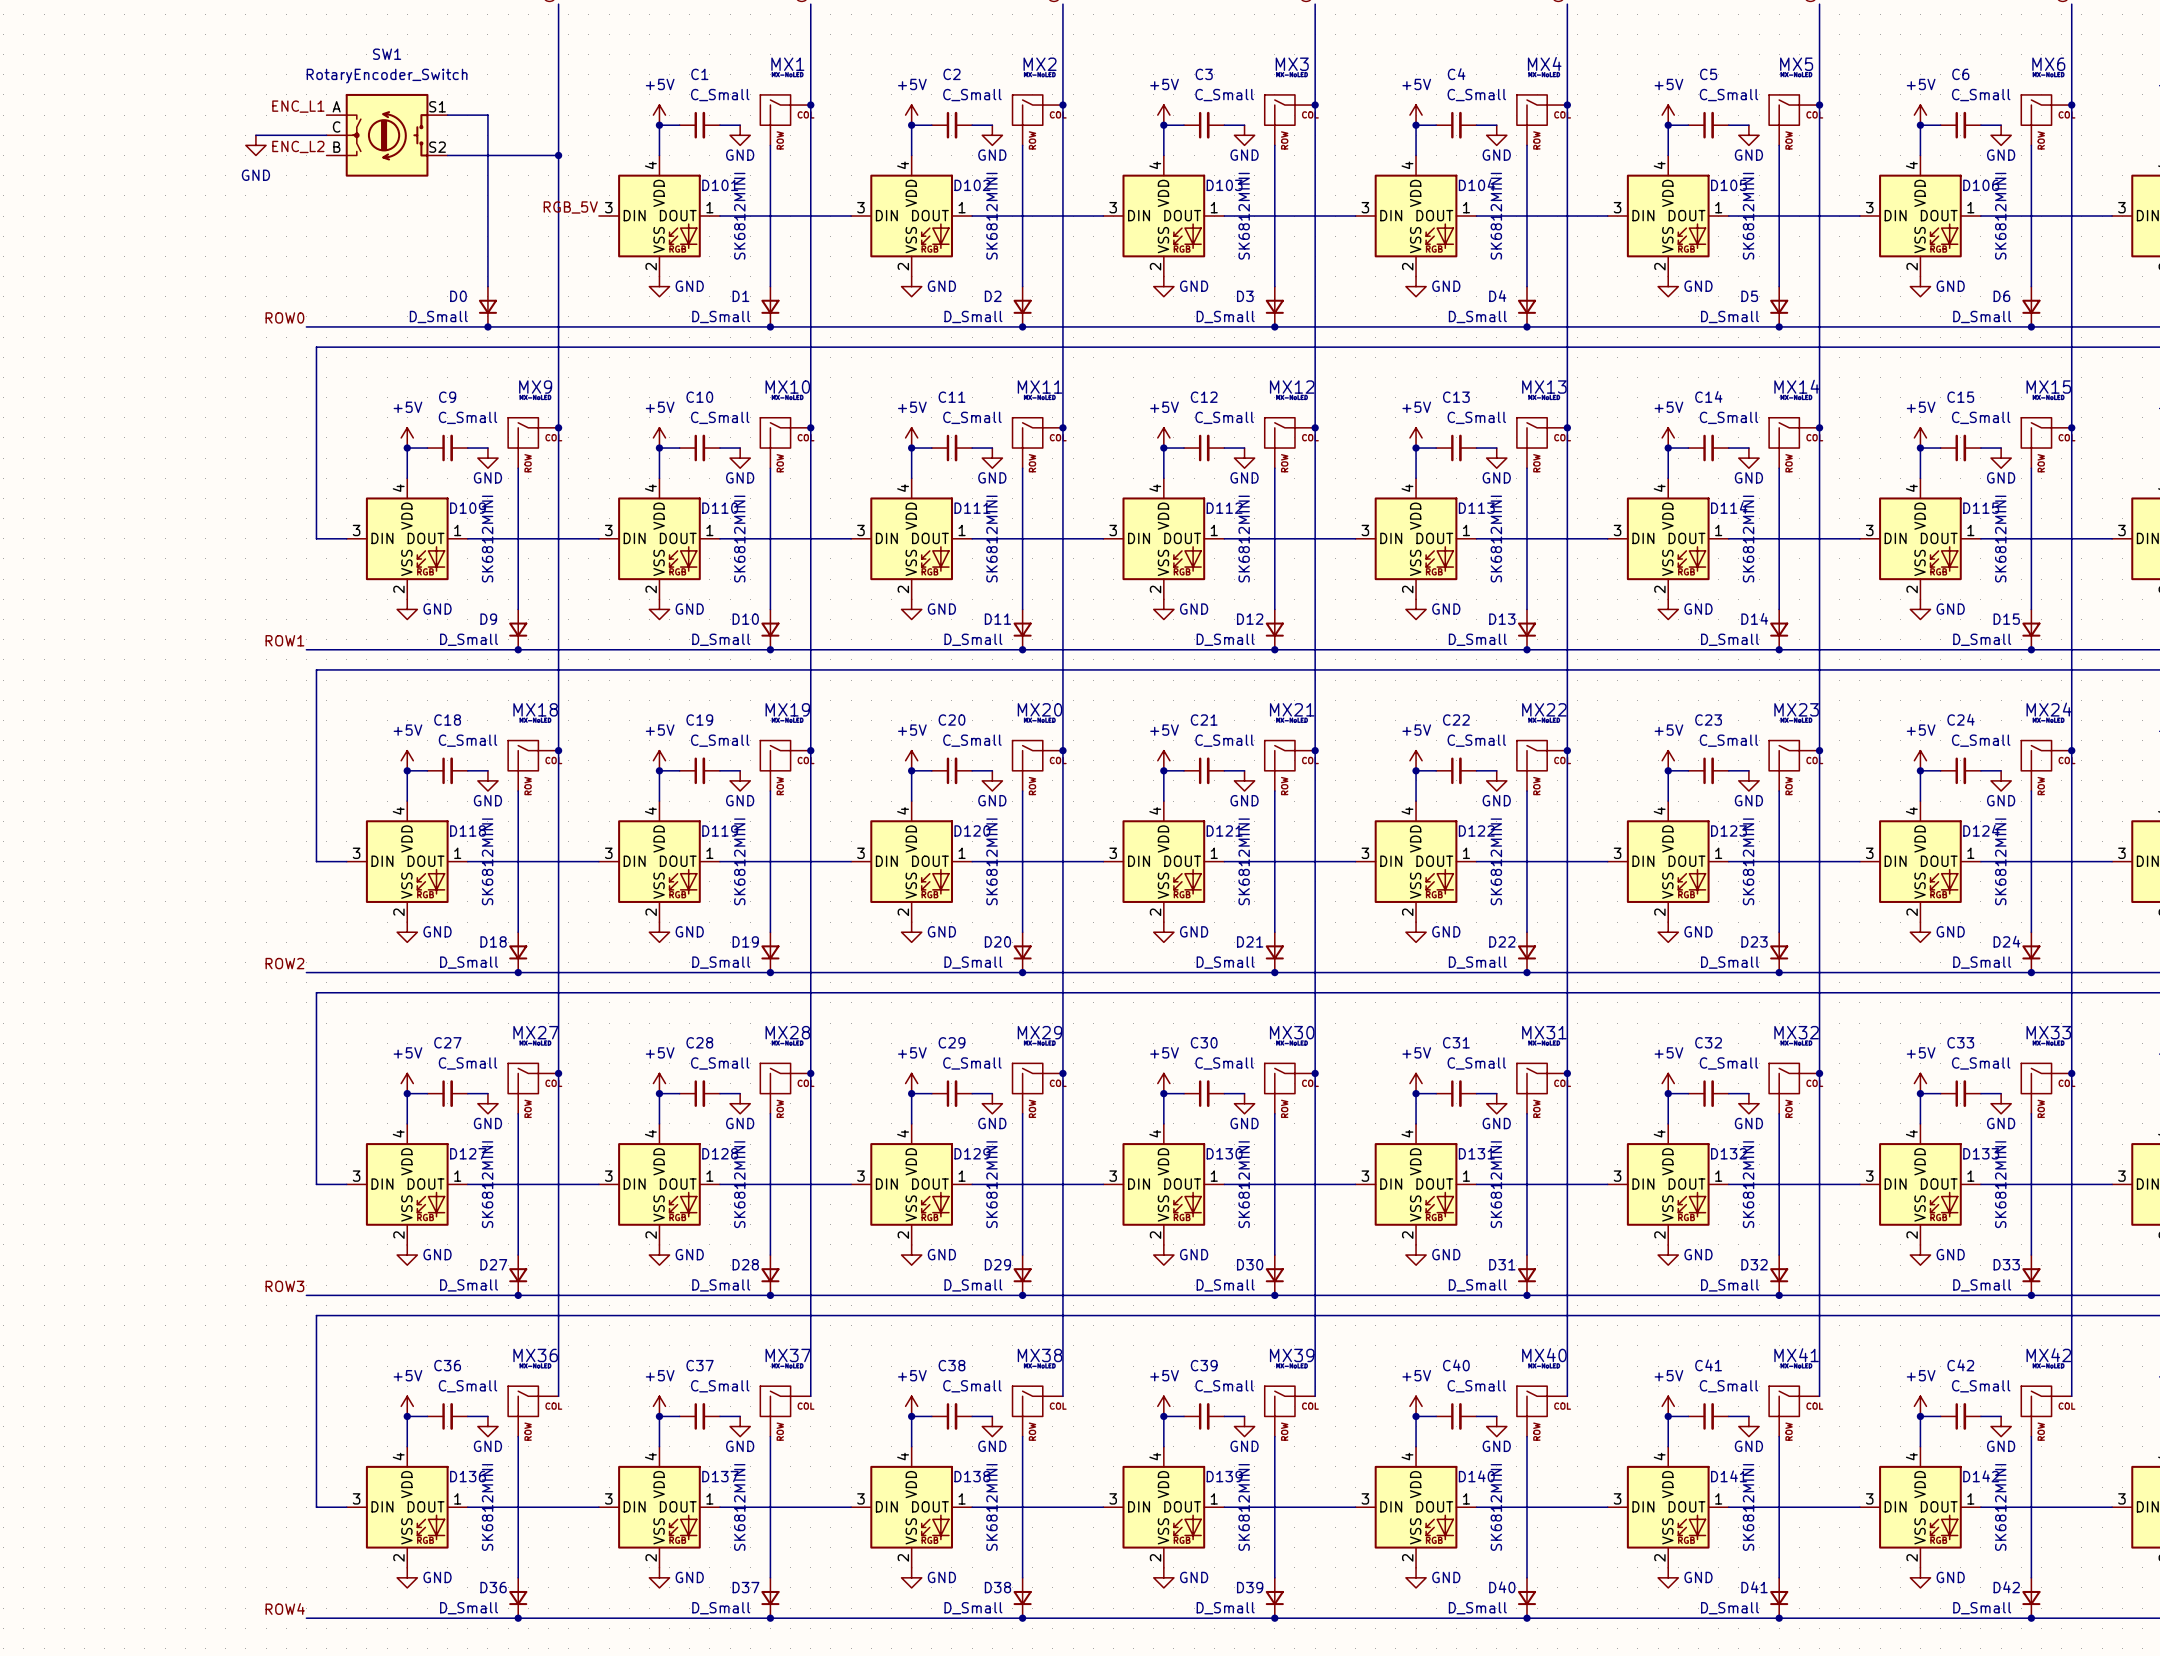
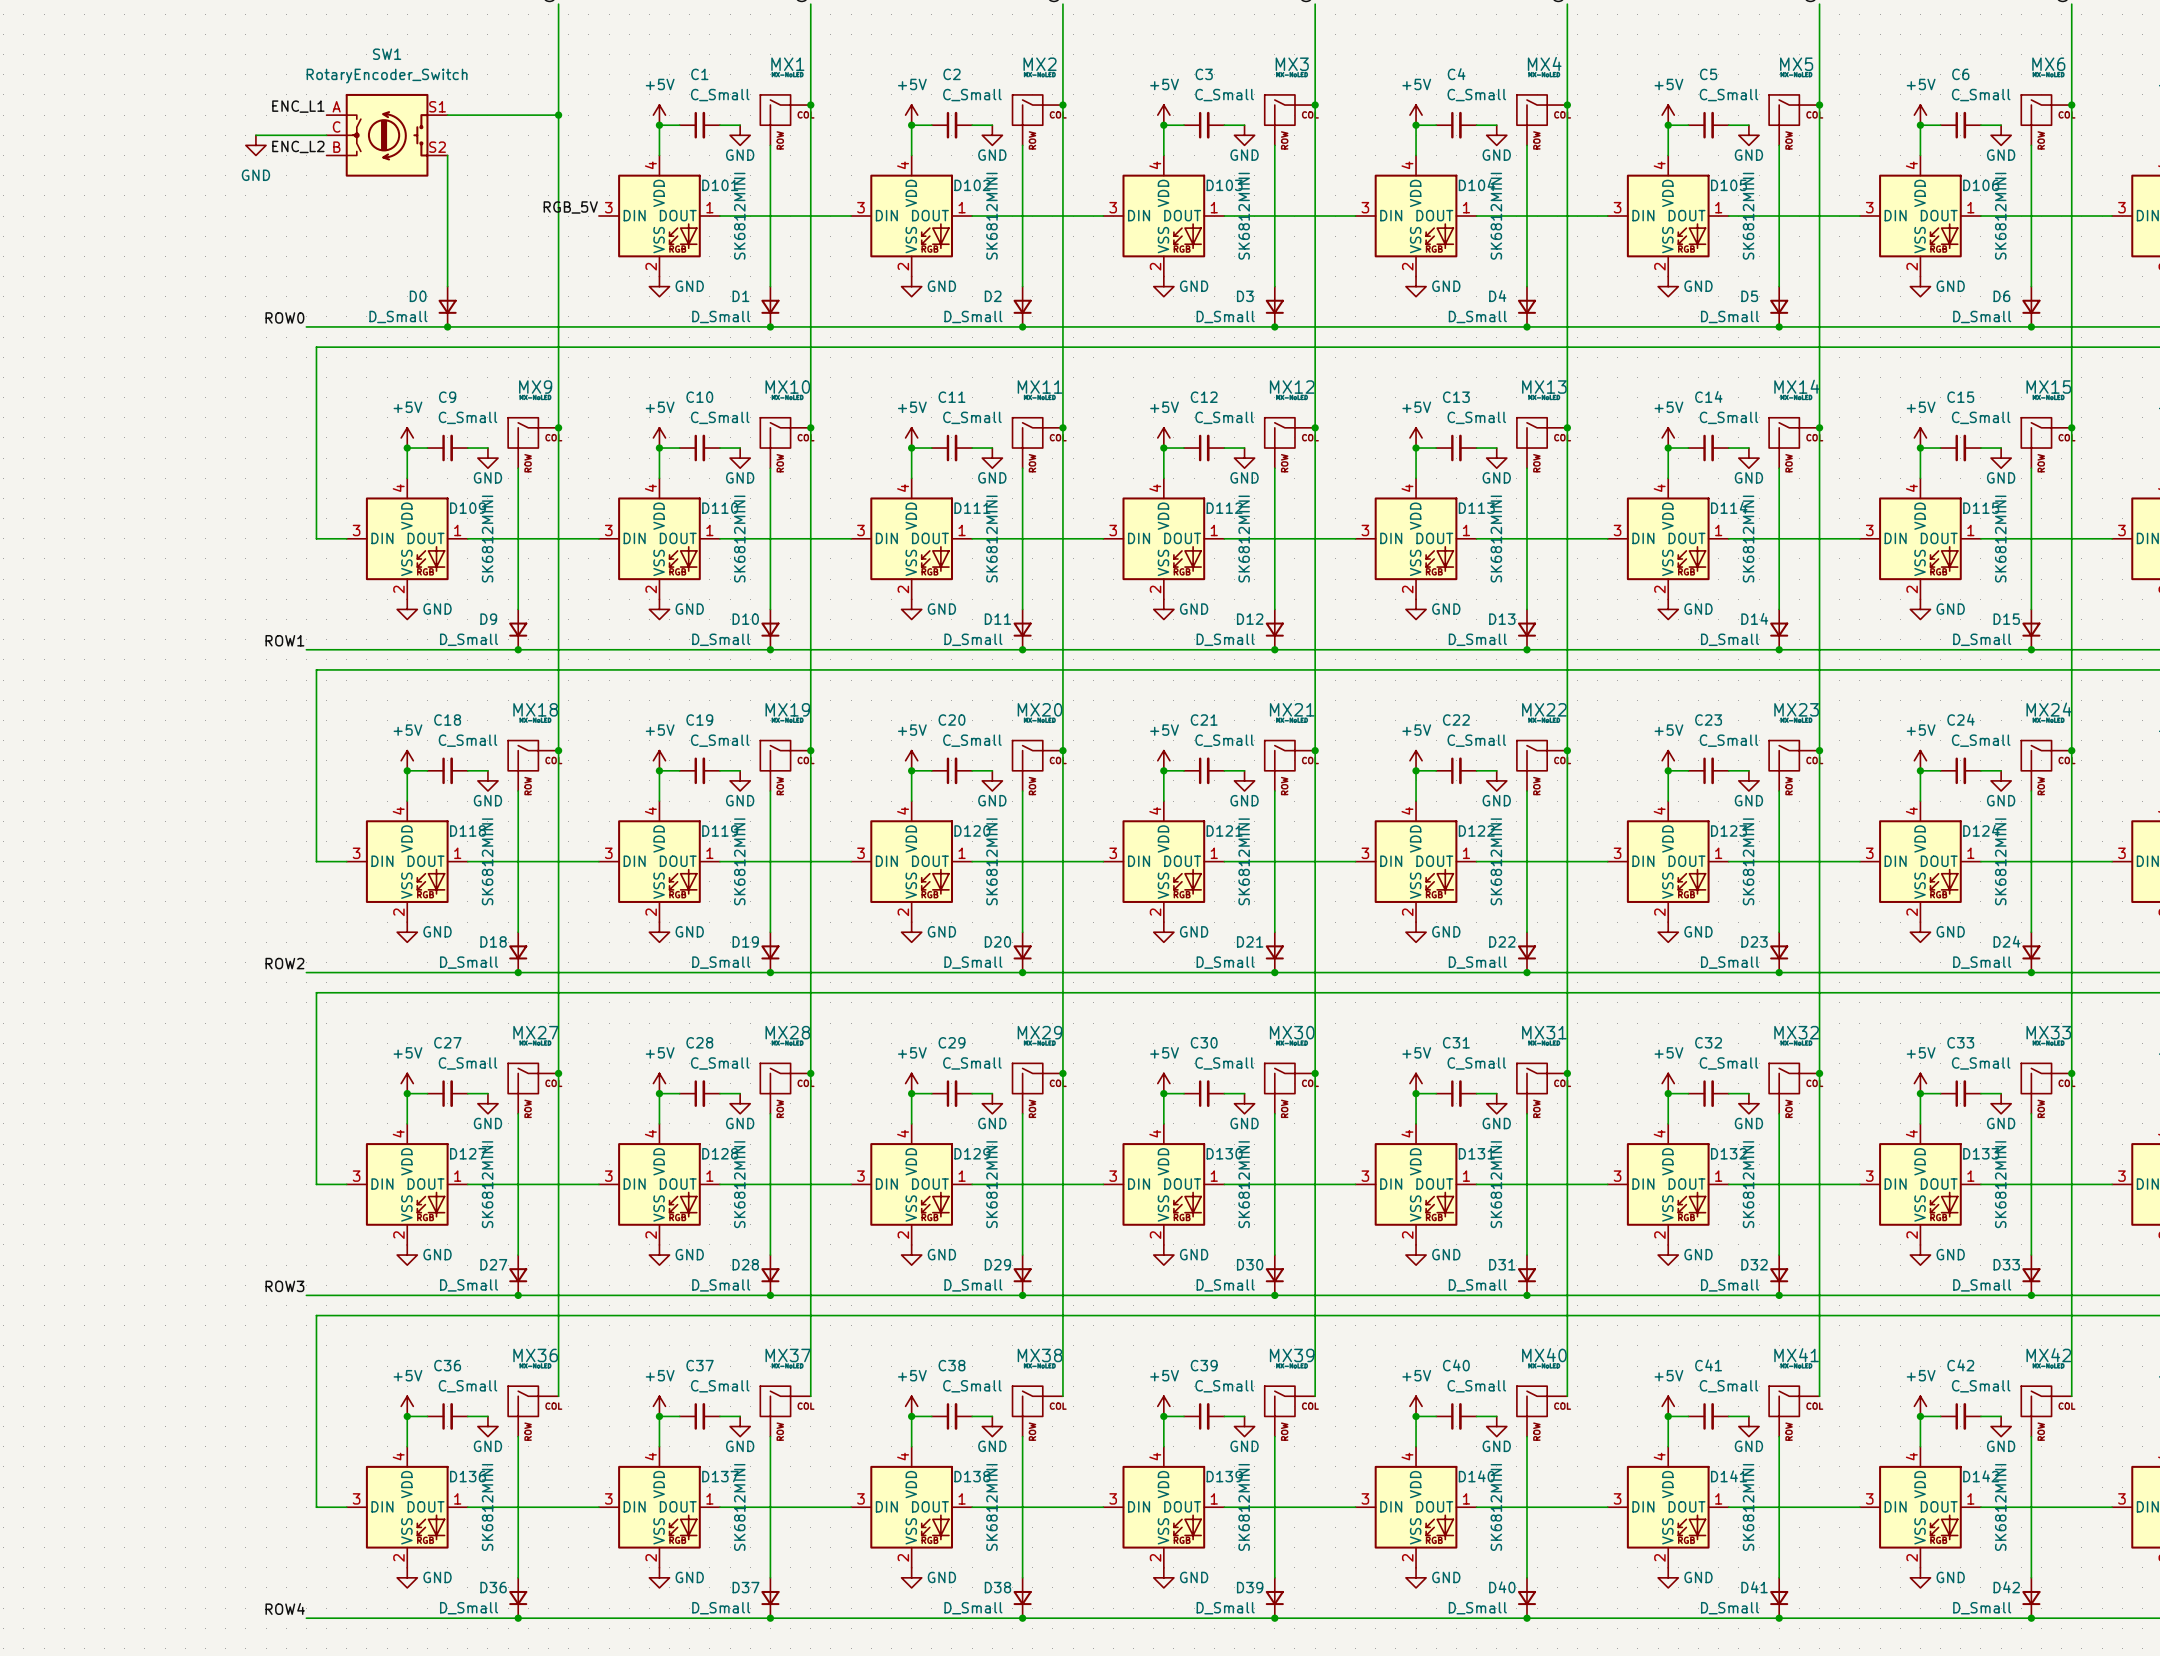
wire: (487, 115) (487, 286) -> (487, 115) (558, 115)
wire: (447, 155) (558, 155) -> (447, 155) (447, 286)
junction position: (558, 155) -> (558, 115)
D0 position: (487, 306) -> (447, 306)
junction position: (487, 326) -> (447, 326)

